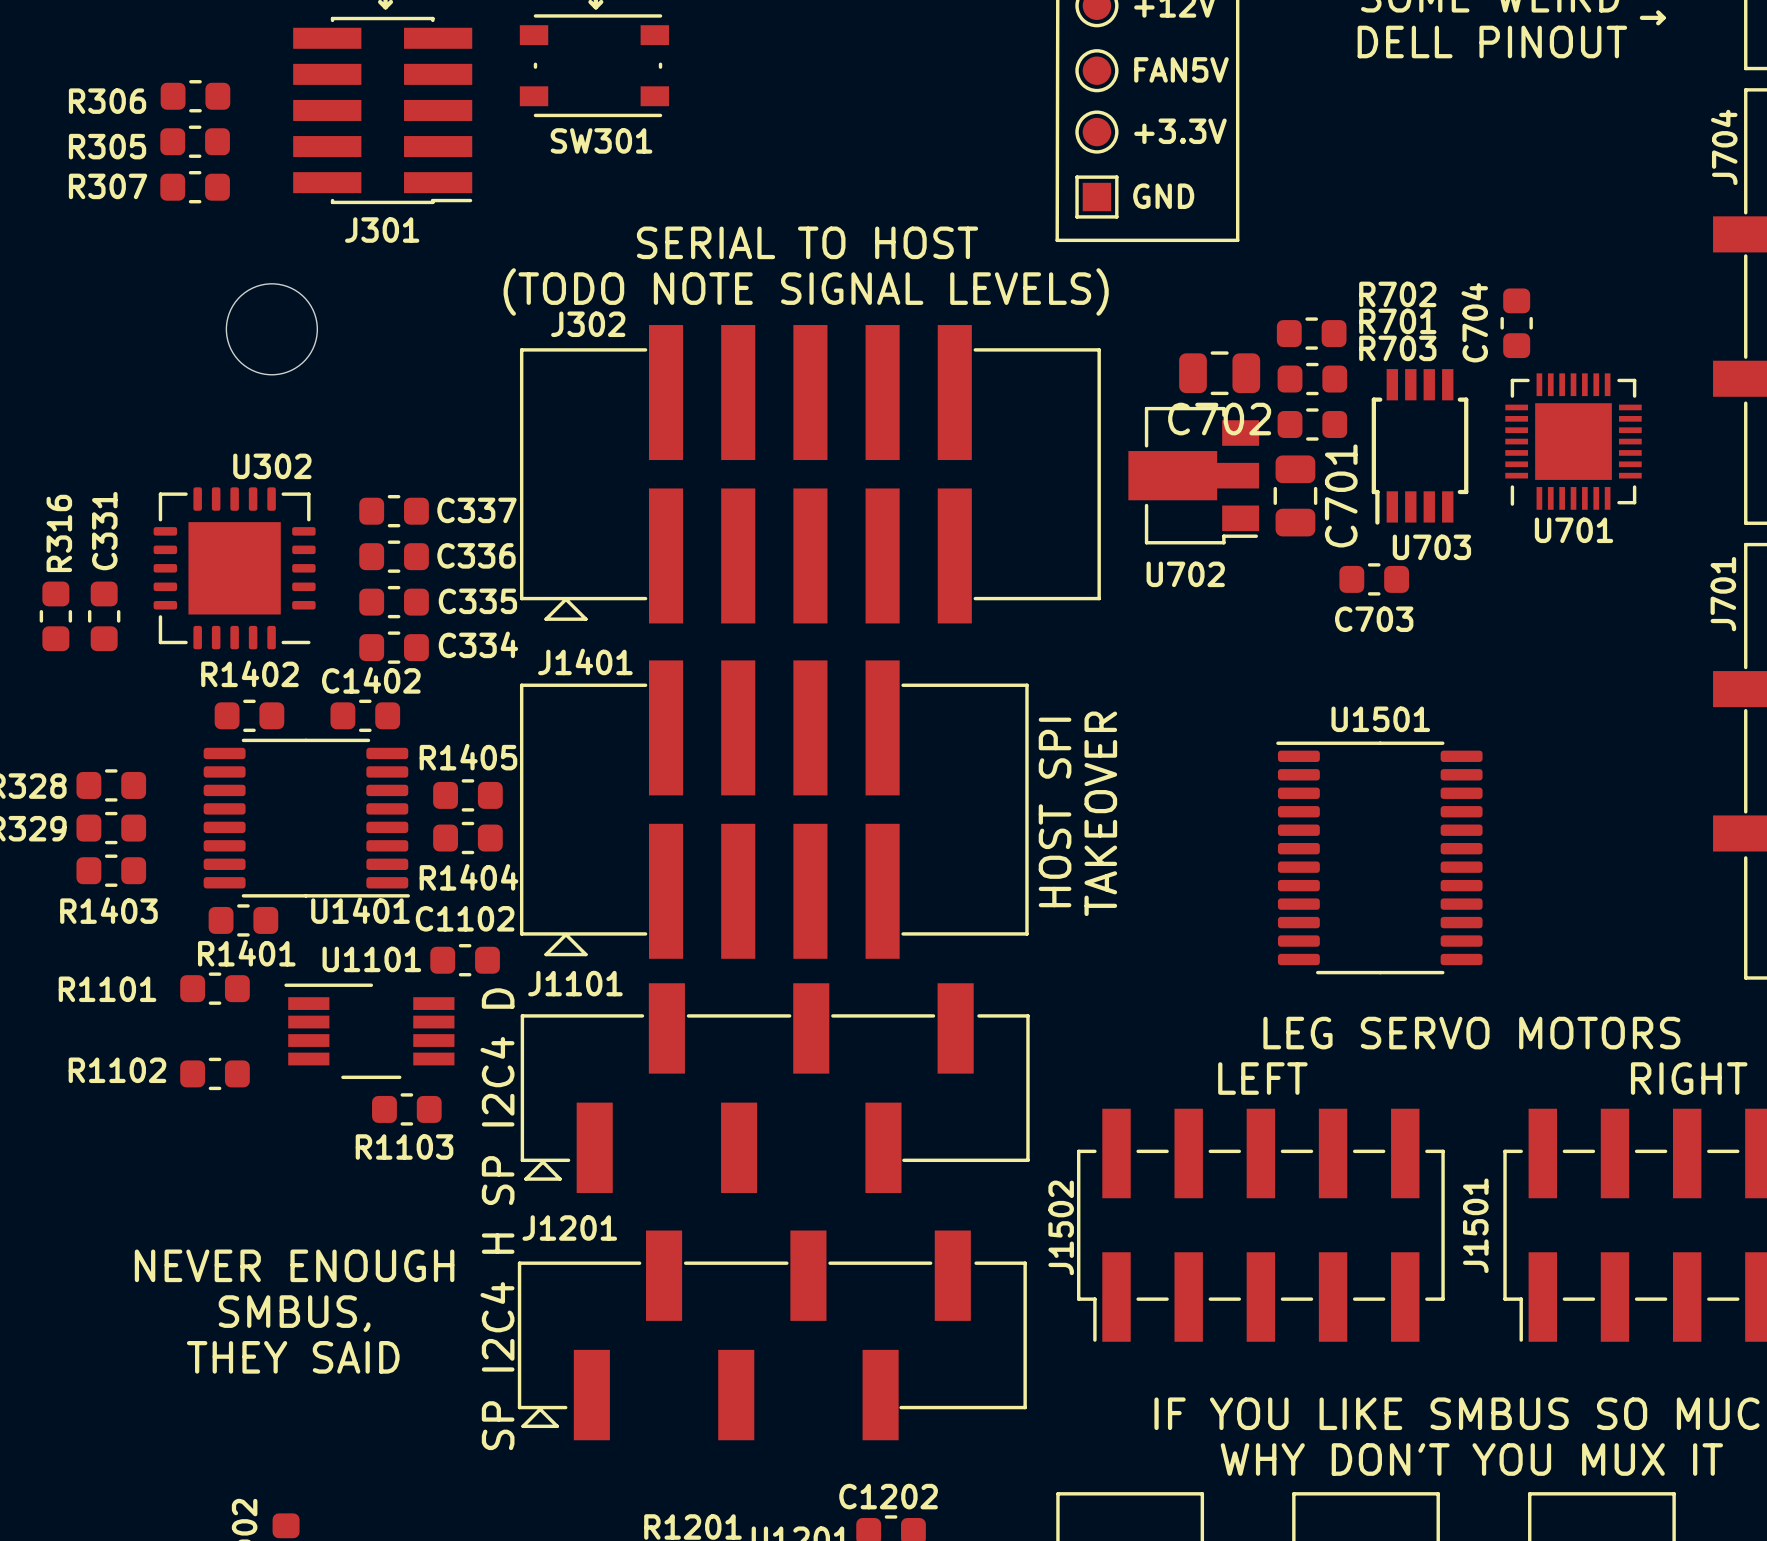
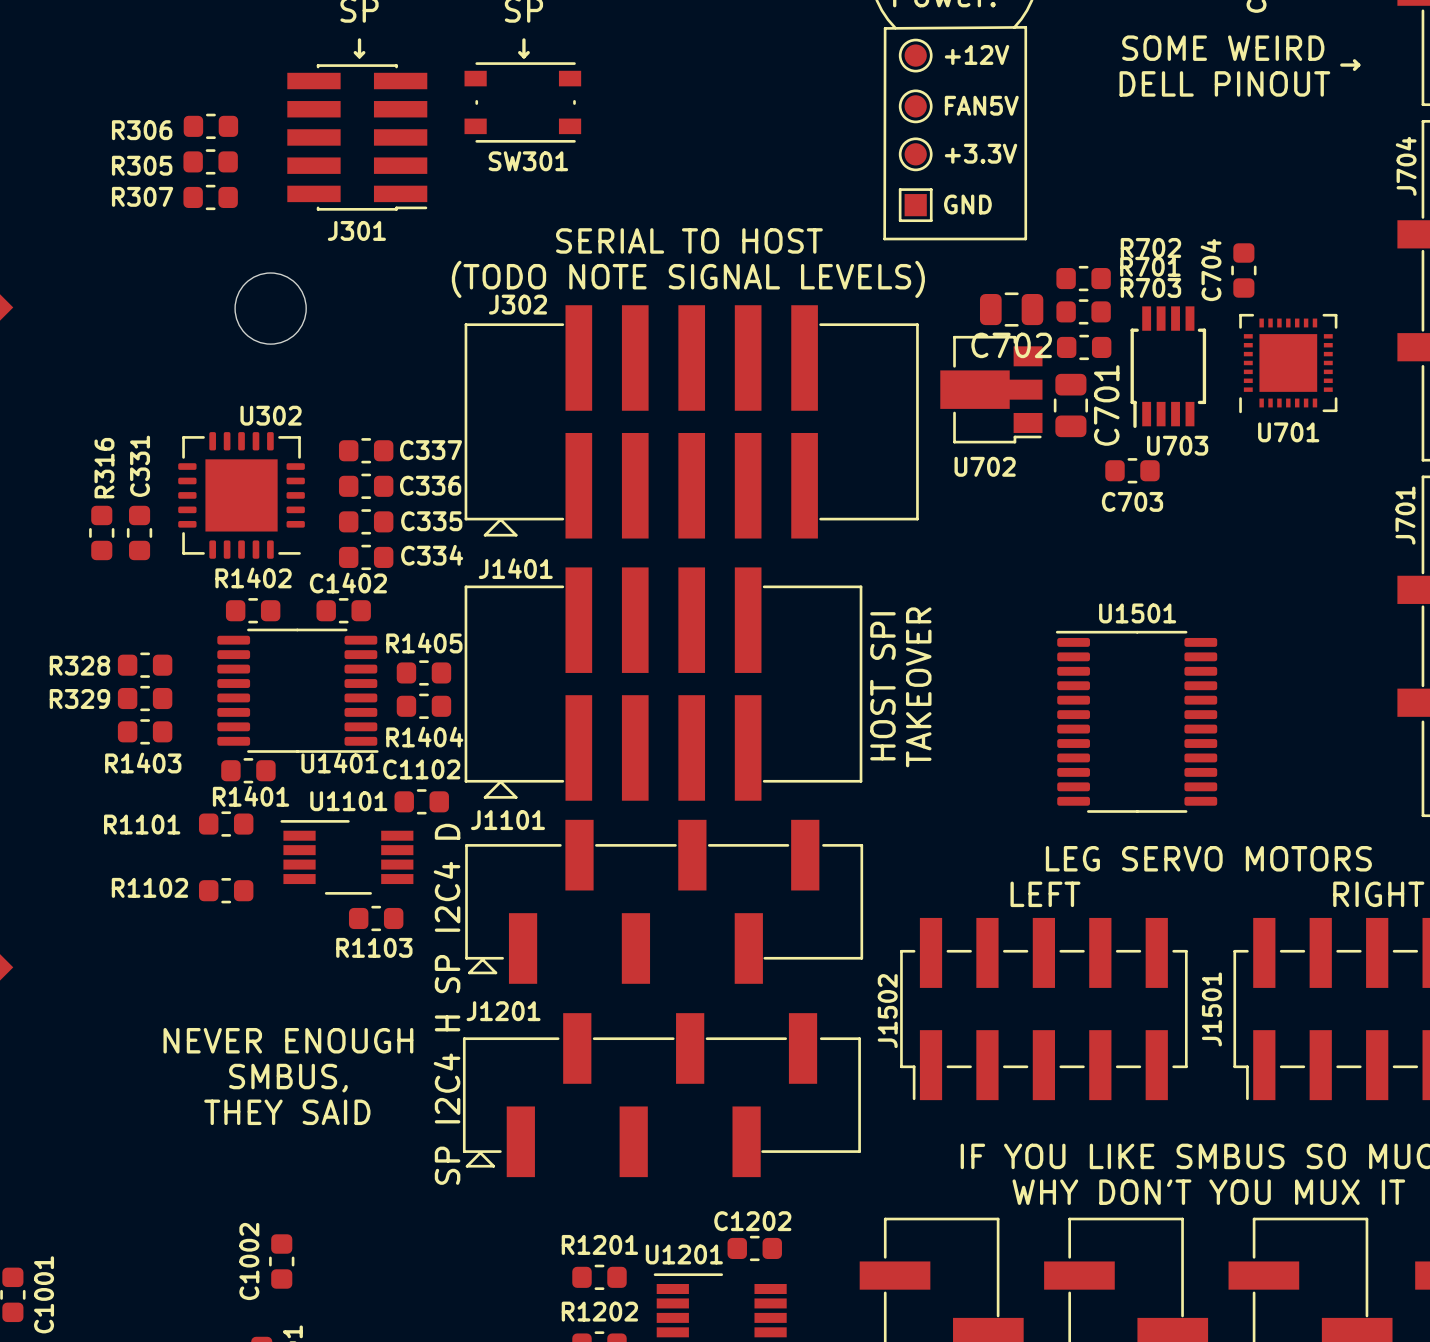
R702: none -> (1083, 278)
R702 name: R702 (1397, 294) -> R701 (1150, 266)
R701 name: R701 (1397, 321) -> R703 (1150, 287)
C704 position: (1516, 323) -> (1243, 270)
C702 position: (1219, 373) -> (1011, 309)
U701 footprint: [1505, 373, 1642, 510] -> [1239, 313, 1338, 414]
R703: (1312, 424) -> none
U703 position: (1420, 446) -> (1168, 367)
U702 position: (1193, 475) -> (991, 389)
C701 position: (1295, 495) -> (1070, 405)
C703 position: (1374, 579) -> (1132, 470)

